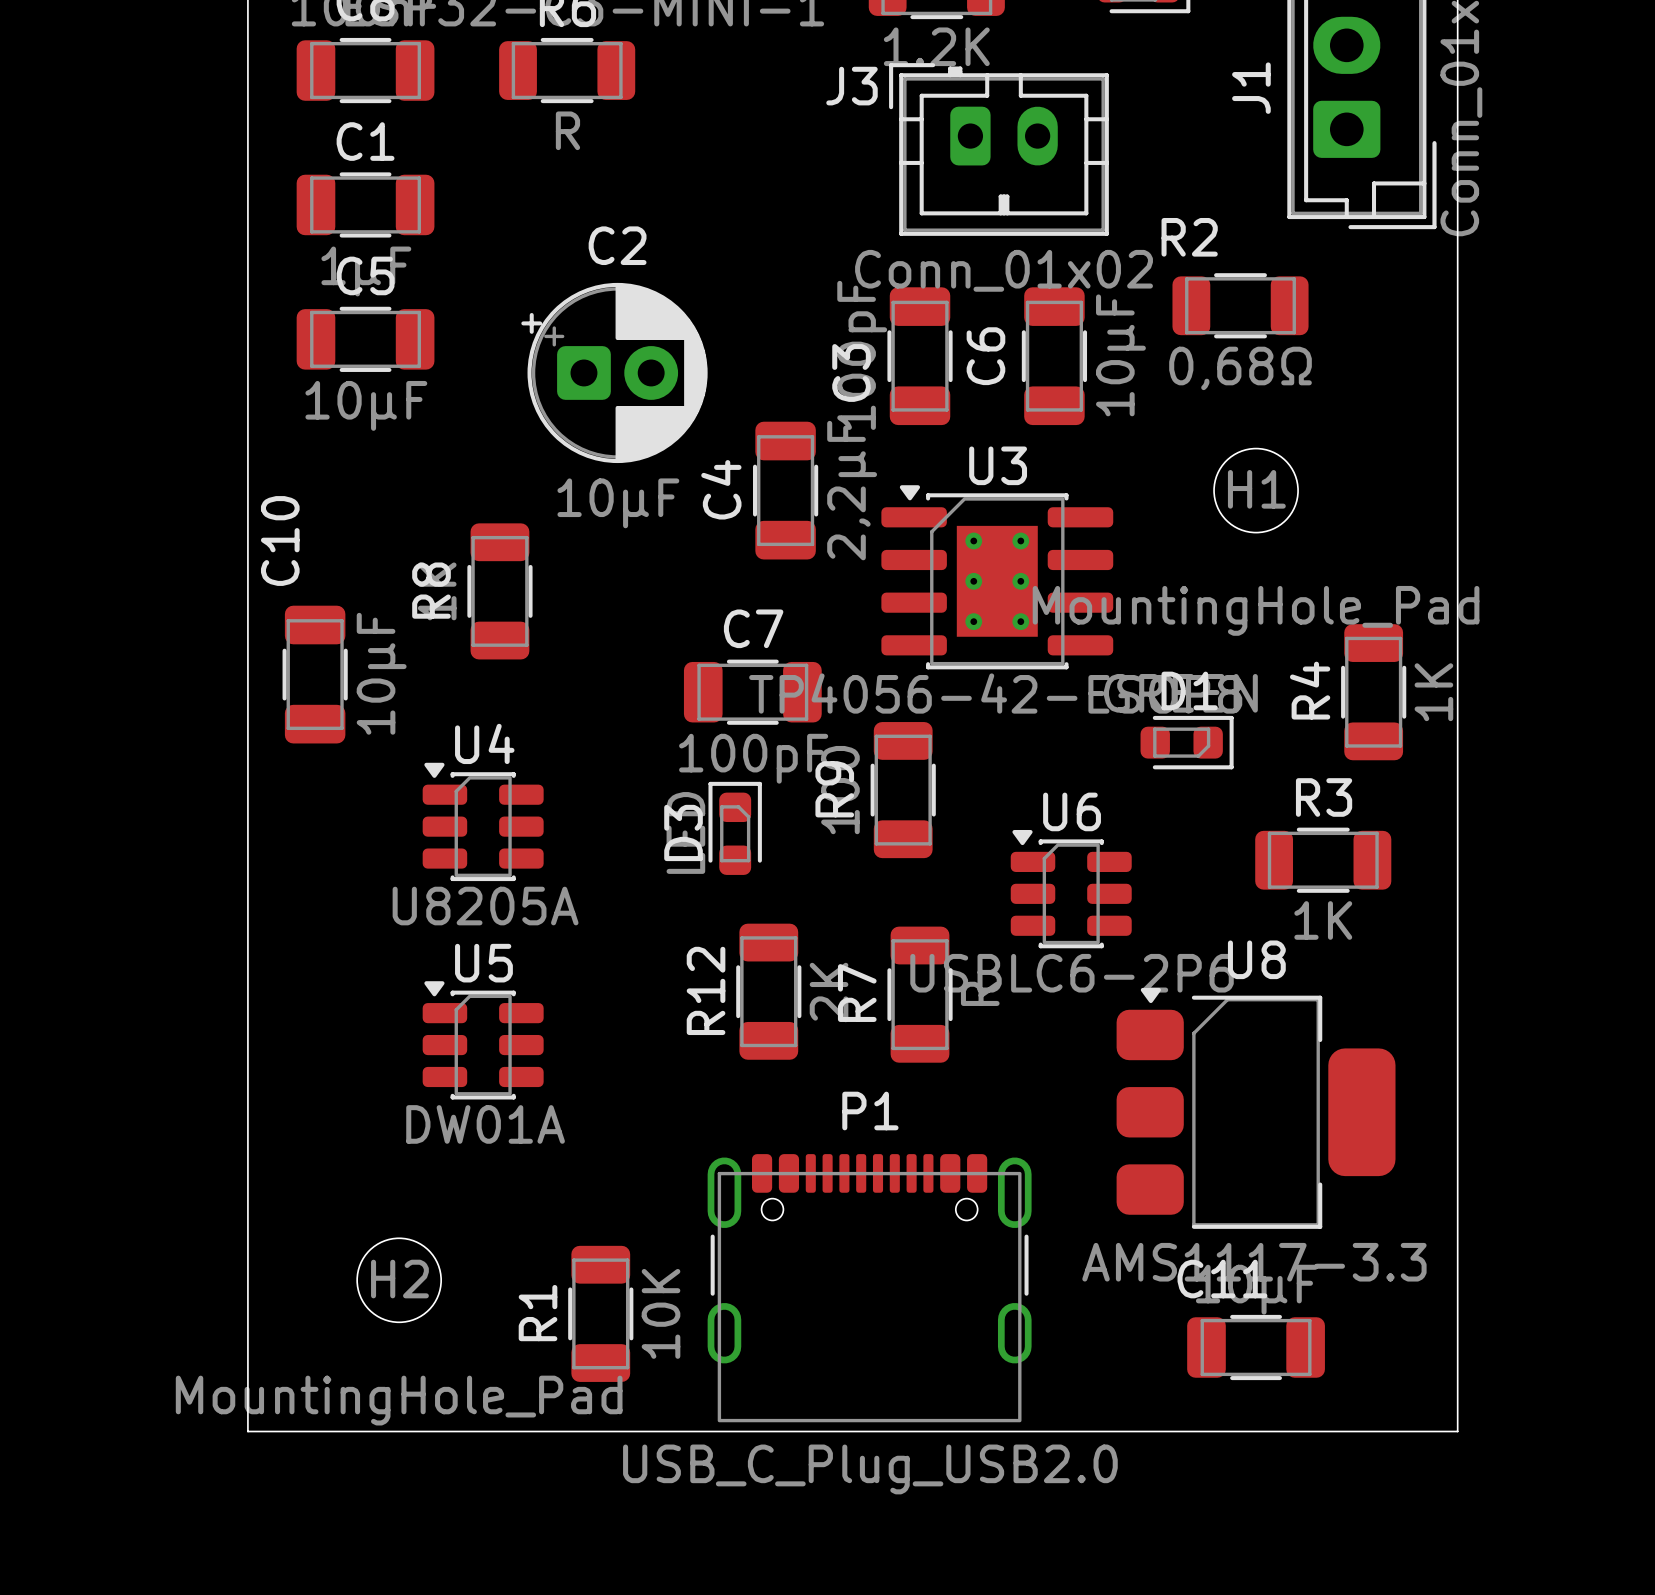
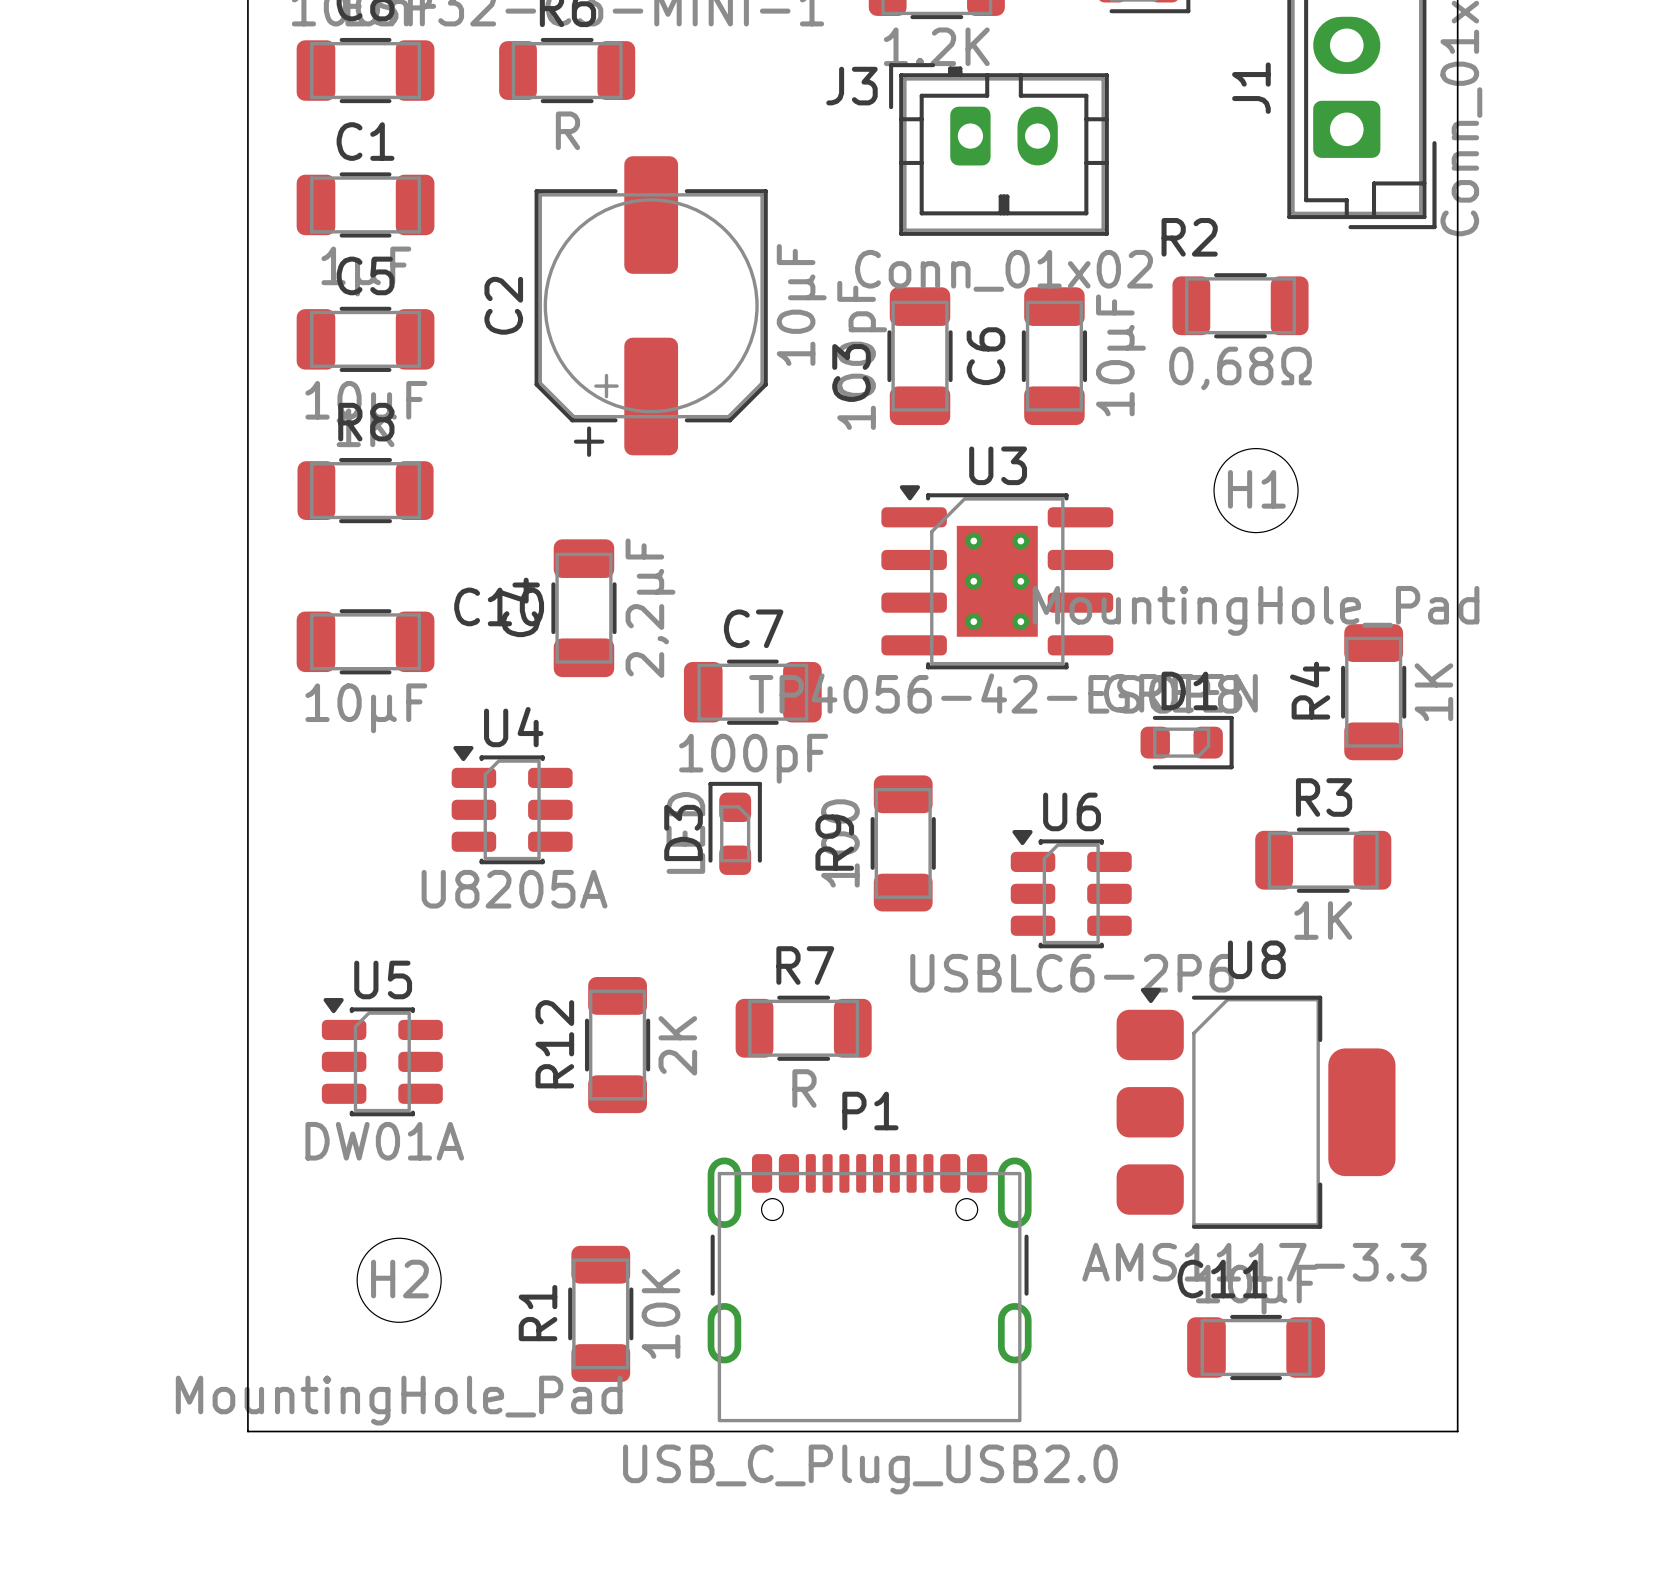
C2 name position: C2 (617, 245) -> C2 (503, 305)
C2 footprint: [521, 282, 708, 464] -> [534, 156, 768, 457]
C4 position: (785, 490) -> (583, 608)
C2 value position: 10µF (618, 503) -> 10µF (801, 304)
R8 rotation: 0° (499, 591) -> 90° clockwise (365, 490)
R8 position: (499, 591) -> (365, 490)
C10 rotation: 0° (315, 674) -> 90° clockwise (365, 641)
R9 position: (903, 790) -> (903, 843)
U4 position: (483, 821) -> (512, 805)
R12 position: (768, 991) -> (617, 1045)
R7 rotation: 0° (920, 994) -> 90° clockwise (803, 1028)
R7 position: (920, 994) -> (803, 1028)
U5 position: (483, 1040) -> (382, 1057)

